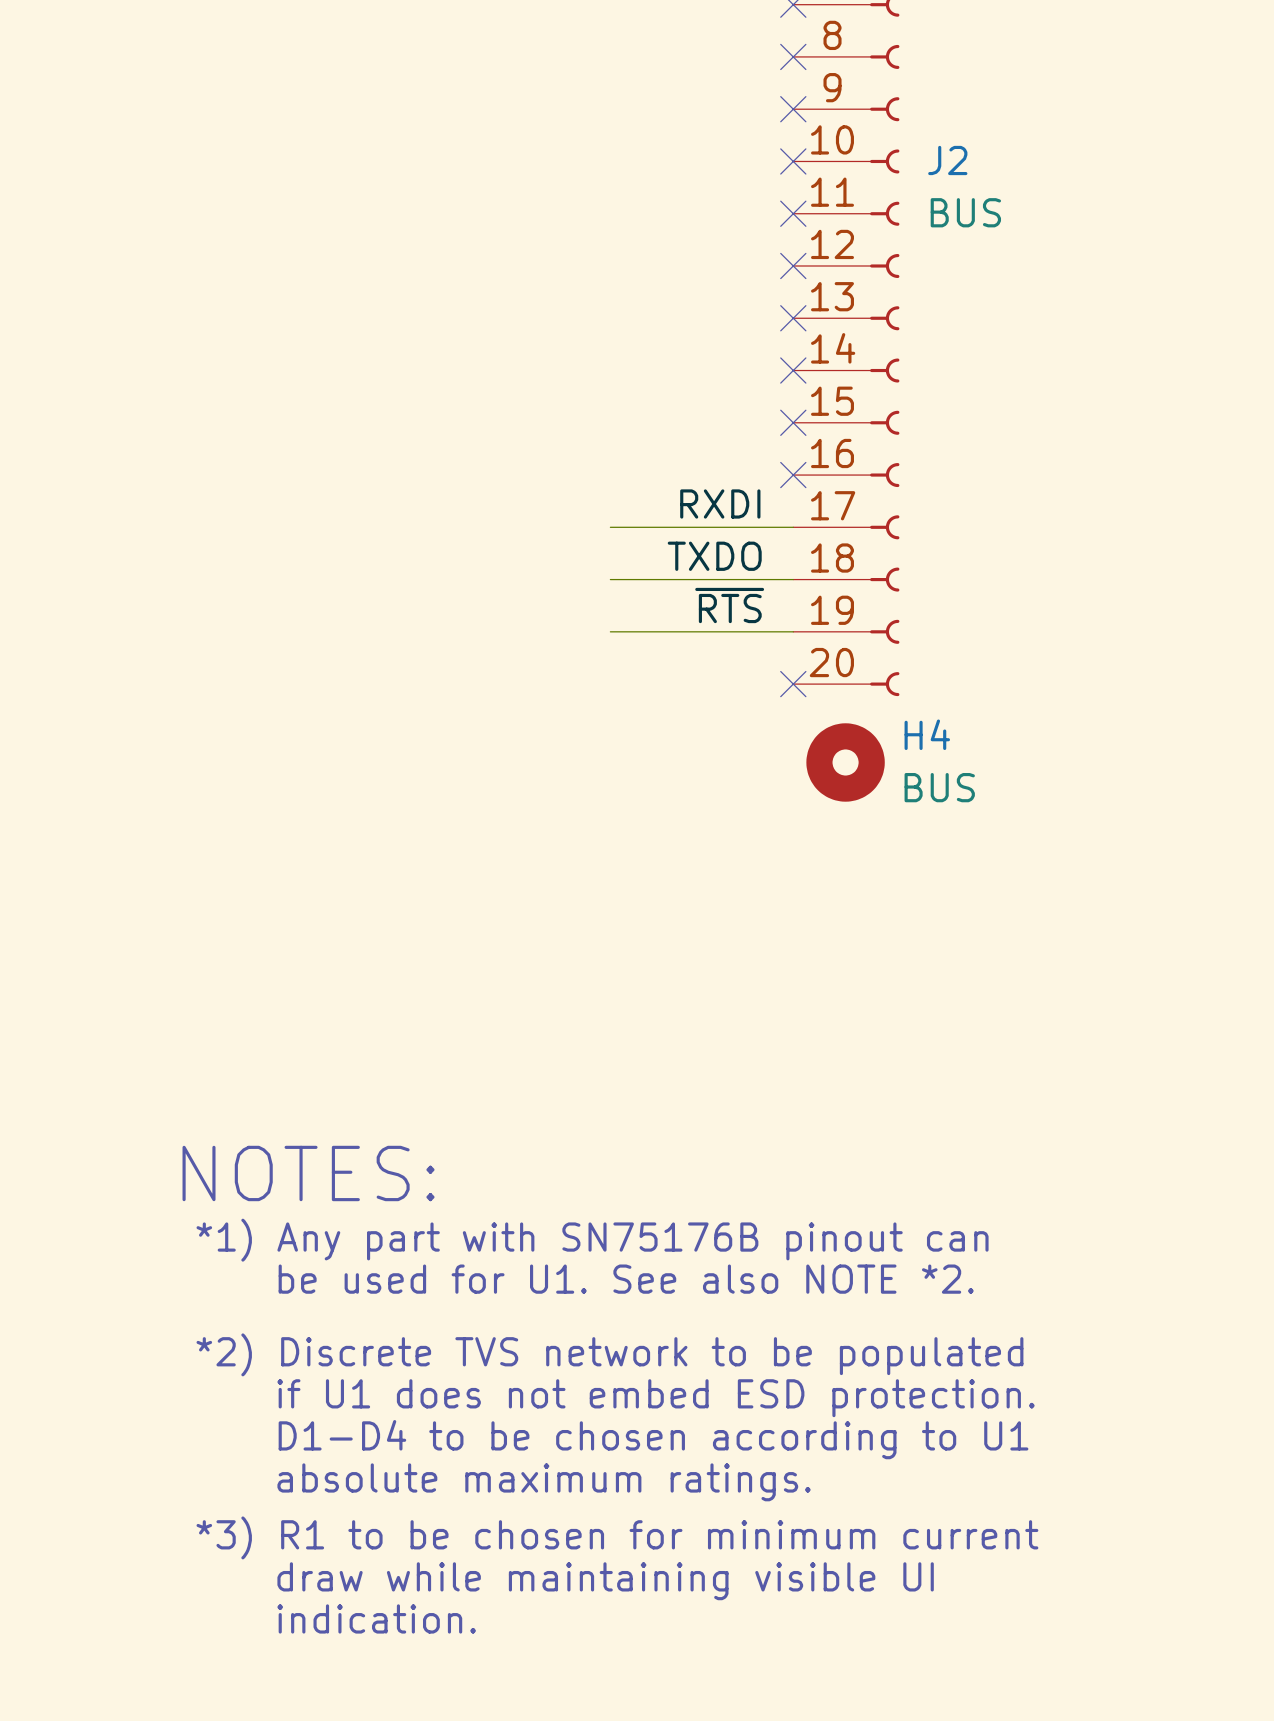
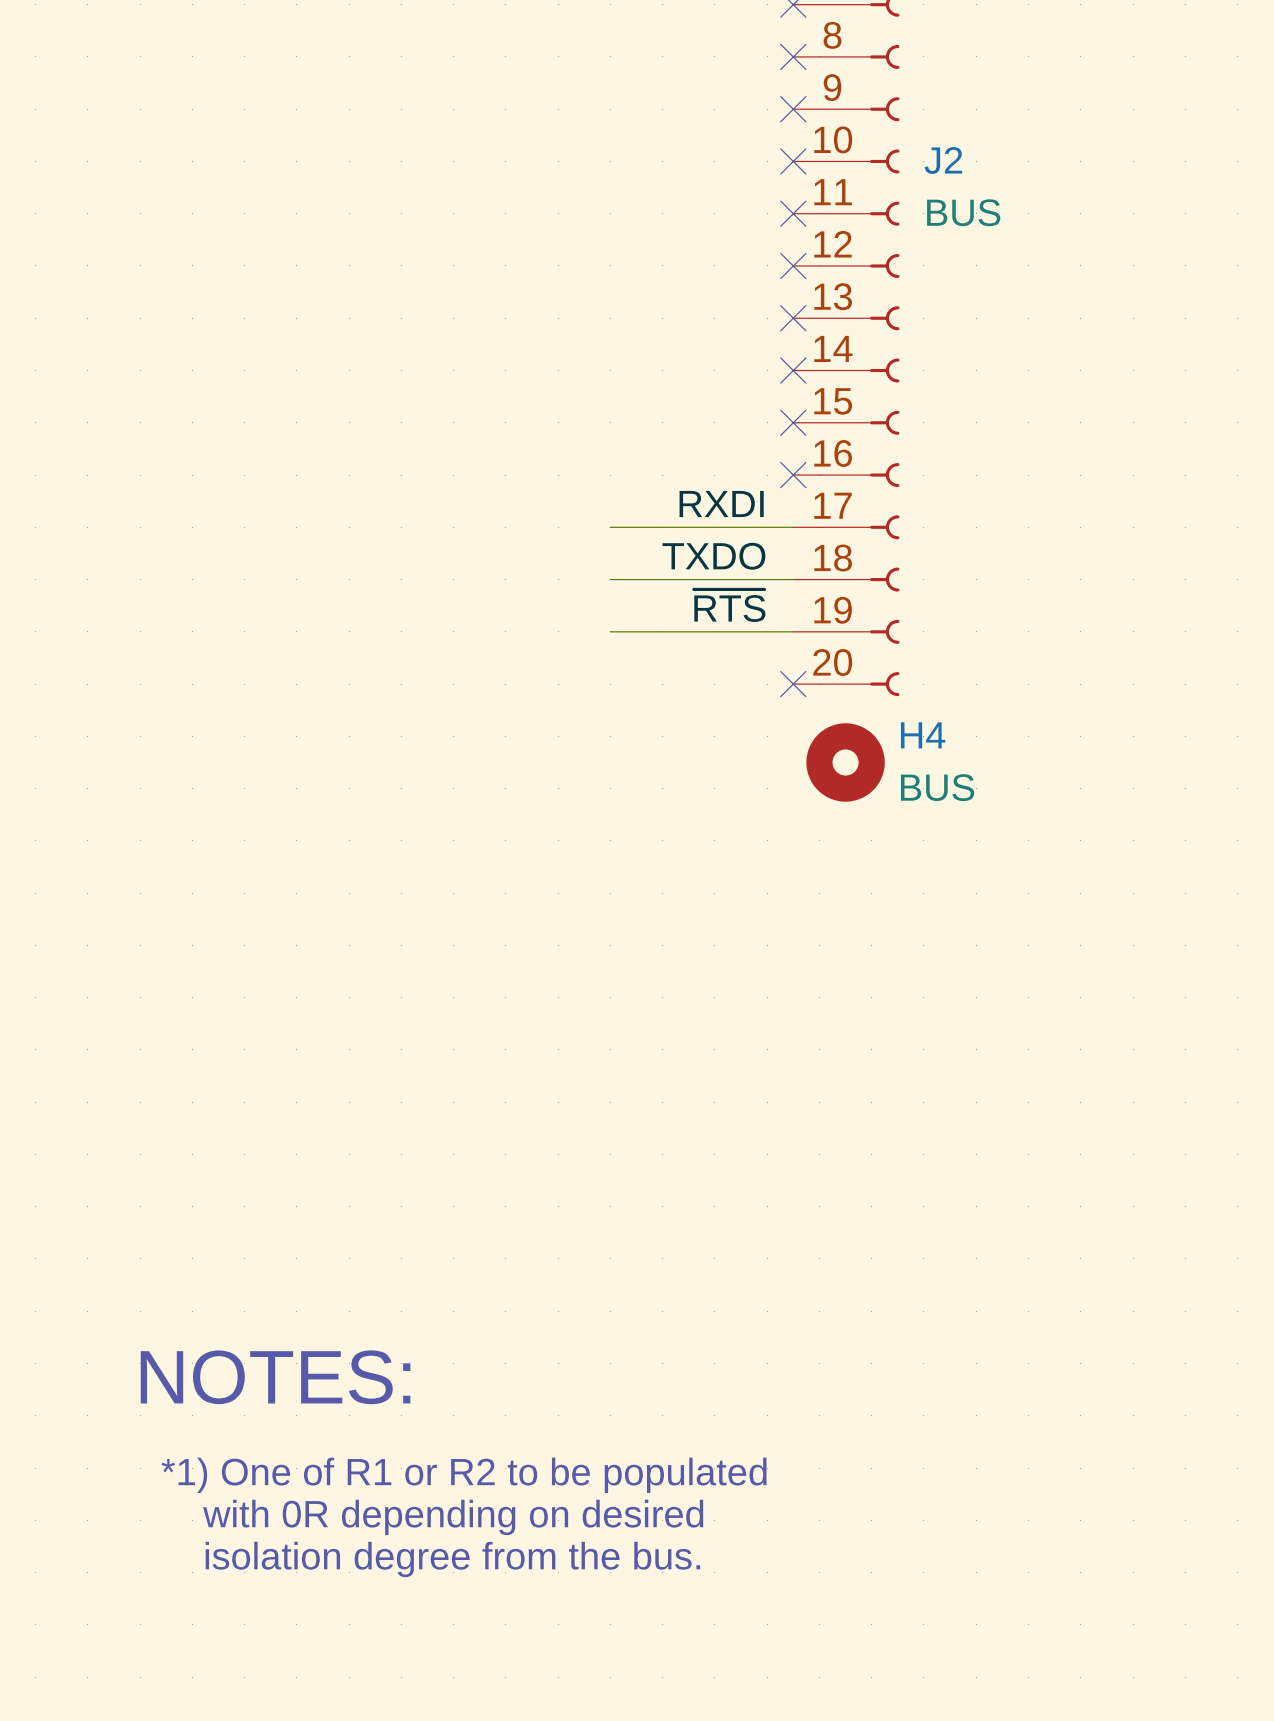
text position: NOTES: (308, 1173) -> NOTES: (275, 1377)
text: *1) Any part with SN75176B pinout can (592, 1240) -> none
text: be used for U1. See also NOTE *2. (626, 1279) -> none
text: *2) Discrete TVS network to be populated (609, 1354) -> none
text: if U1 does not embed ESD protection. (656, 1398) -> none
text: D1-D4 to be chosen according to U1 (653, 1439) -> none
text: none -> *1) One of R1 or R2 to be populated (464, 1475)
text: absolute maximum ratings. (544, 1482) -> none
text: none -> with 0R depending on desired (453, 1517)
text: *3) R1 to be chosen for minimum current (617, 1537) -> none
text: none -> isolation degree from the bus. (452, 1559)
text: draw while maintaining visible UI (605, 1581) -> none
text: indication. (376, 1618) -> none

